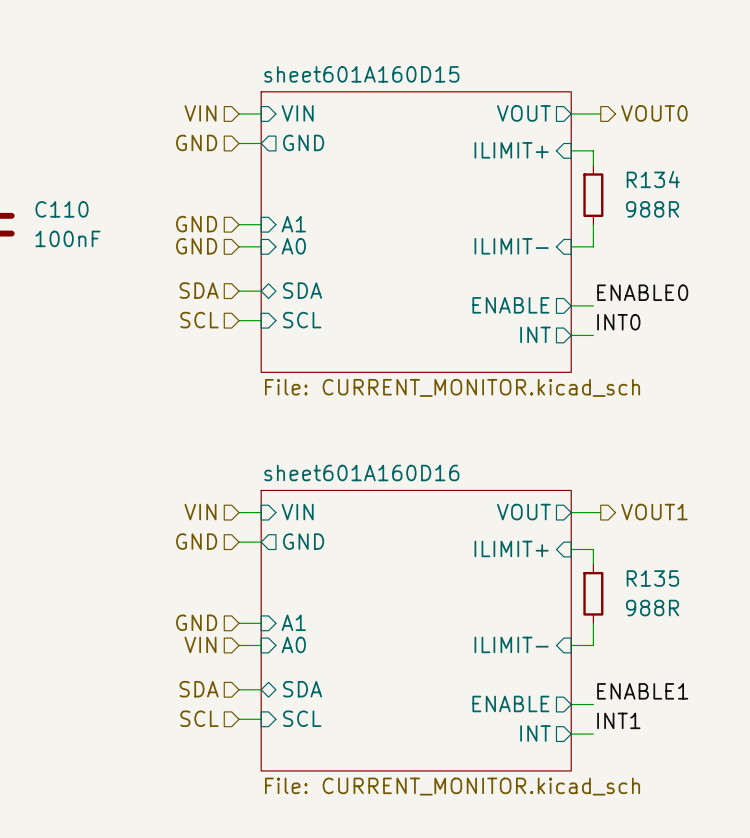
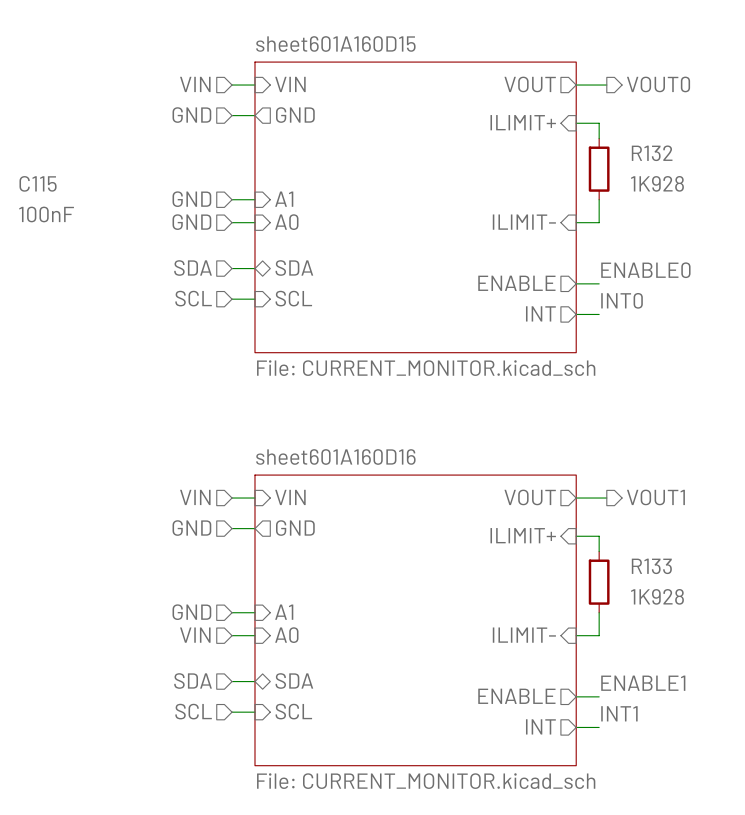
R134 name: R134 (653, 179) -> R132 (652, 153)
C110 name: C110 (61, 209) -> C115 (38, 183)
R134 value: 988R (652, 209) -> 1K928 (657, 183)
R135 name: R135 (652, 578) -> R133 (651, 566)
R135 value: 988R (652, 608) -> 1K928 (657, 596)

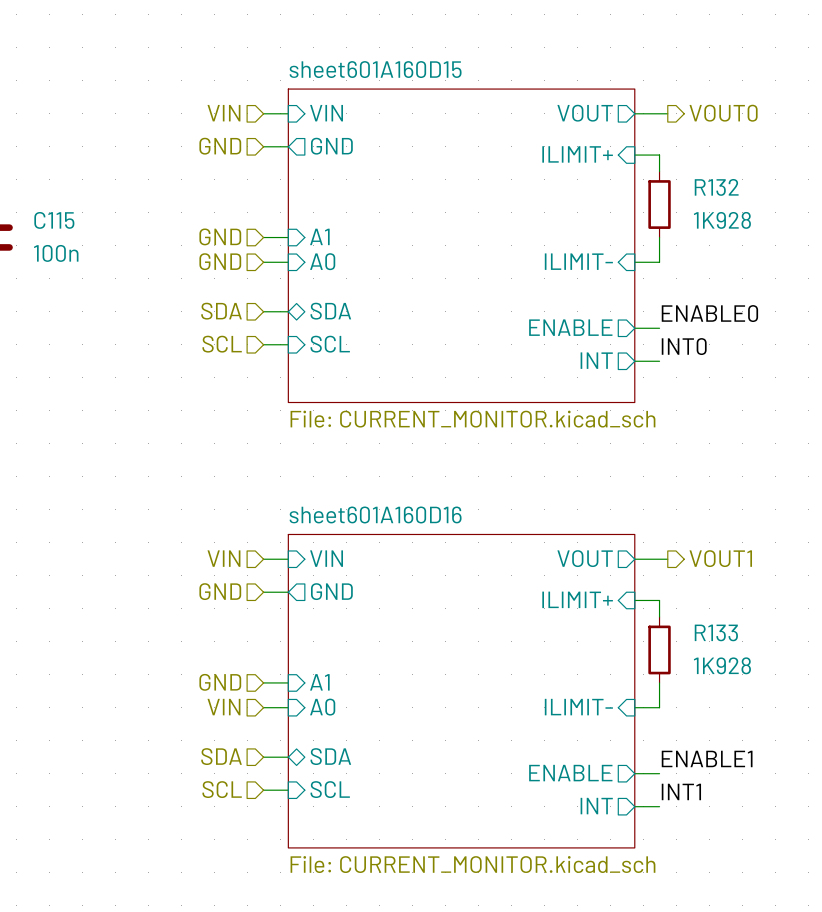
C115 value: 100nF (46, 214) -> 100n (56, 253)

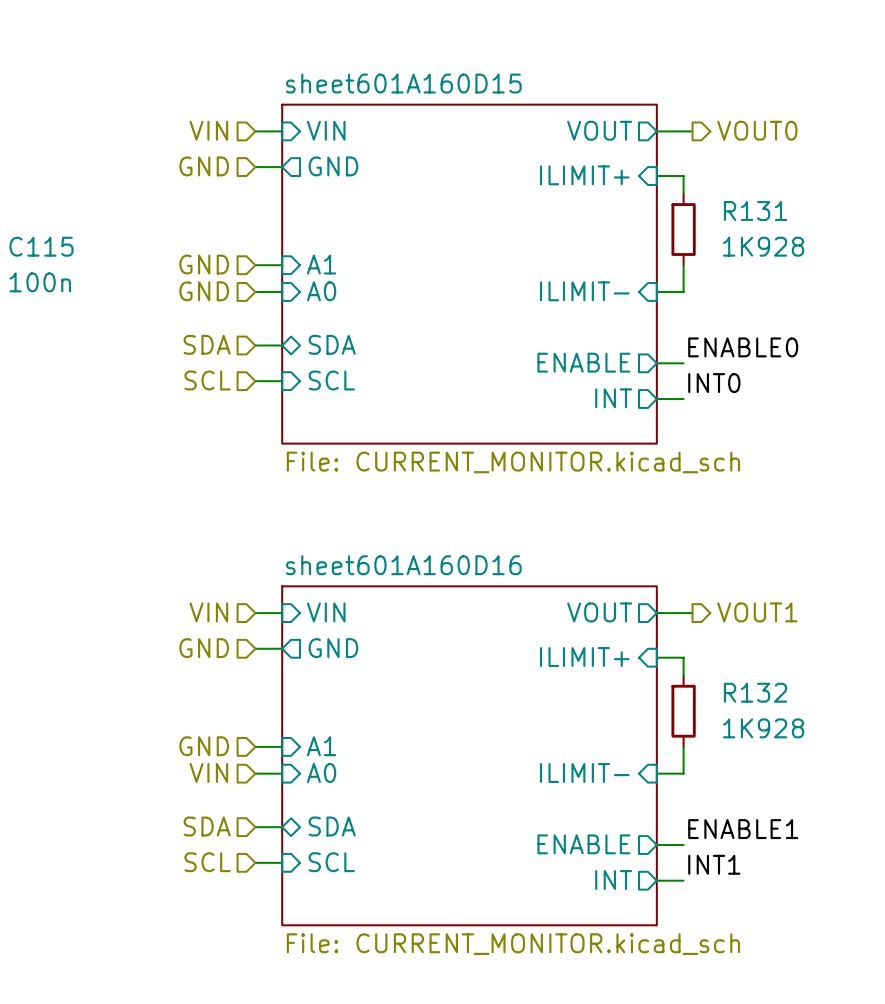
R132 name: R132 (716, 187) -> R131 (755, 211)
R133 name: R133 (716, 632) -> R132 (755, 692)

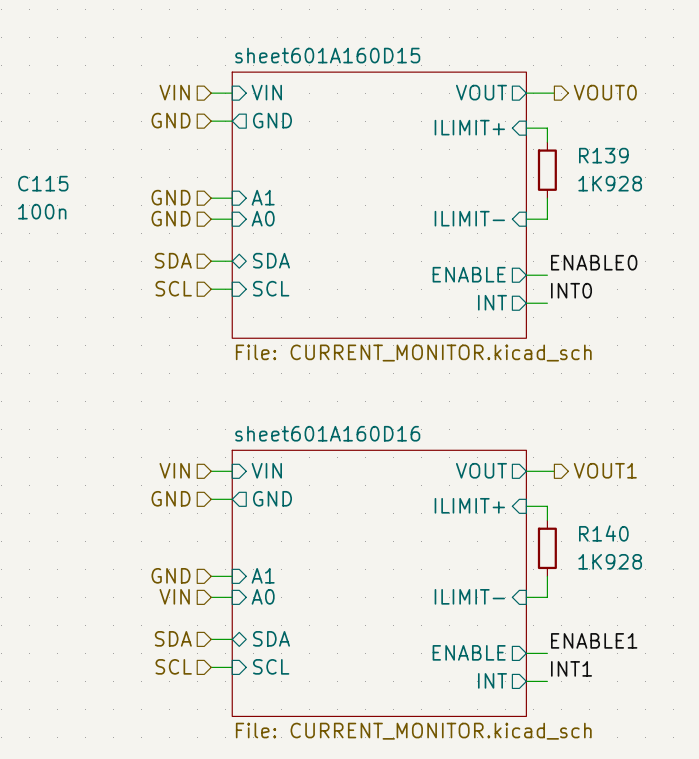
R131 name: R131 (755, 211) -> R139 (603, 155)
R132 name: R132 (755, 692) -> R140 (603, 533)

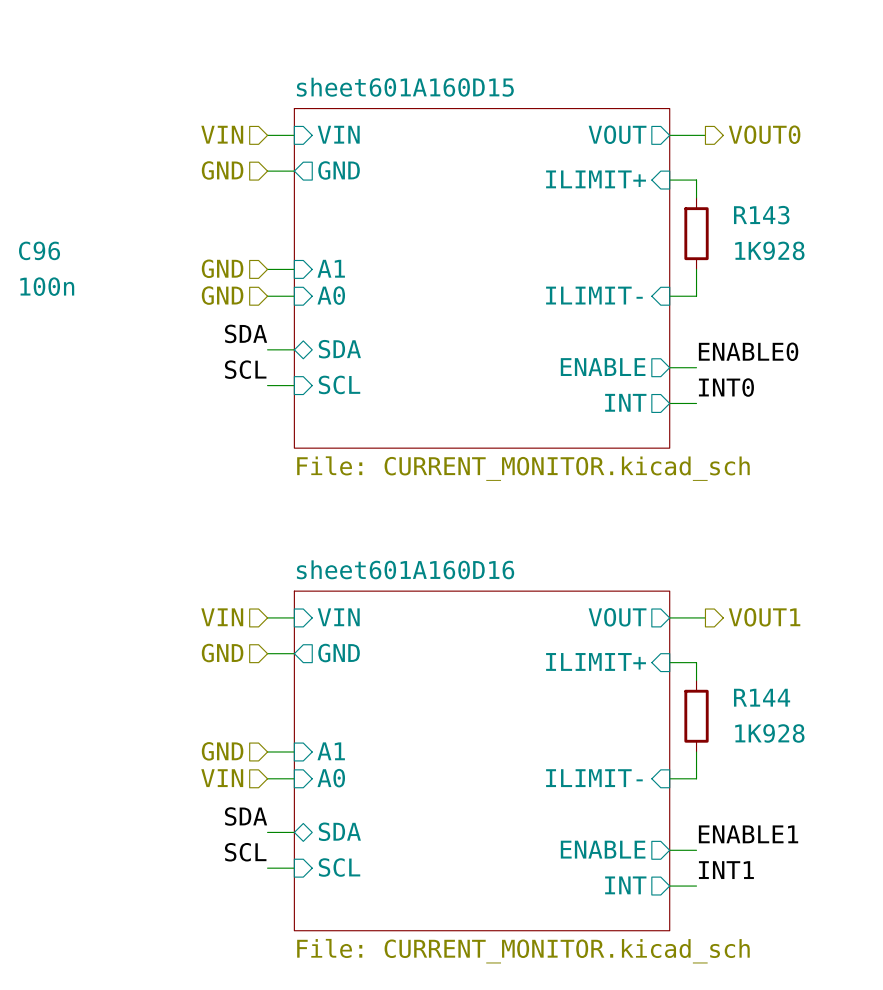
R139 name: R139 (603, 155) -> R143 (761, 215)
C115 name: C115 (43, 183) -> C96 (39, 250)
label: none -> SDA (246, 333)
hierarchical label: SDA (173, 260) -> none
label: none -> SCL (245, 369)
hierarchical label: SCL (173, 288) -> none
R140 name: R140 (603, 533) -> R144 (762, 697)
label: none -> SDA (246, 816)
hierarchical label: SDA (173, 638) -> none
label: none -> SCL (245, 852)
hierarchical label: SCL (173, 666) -> none

